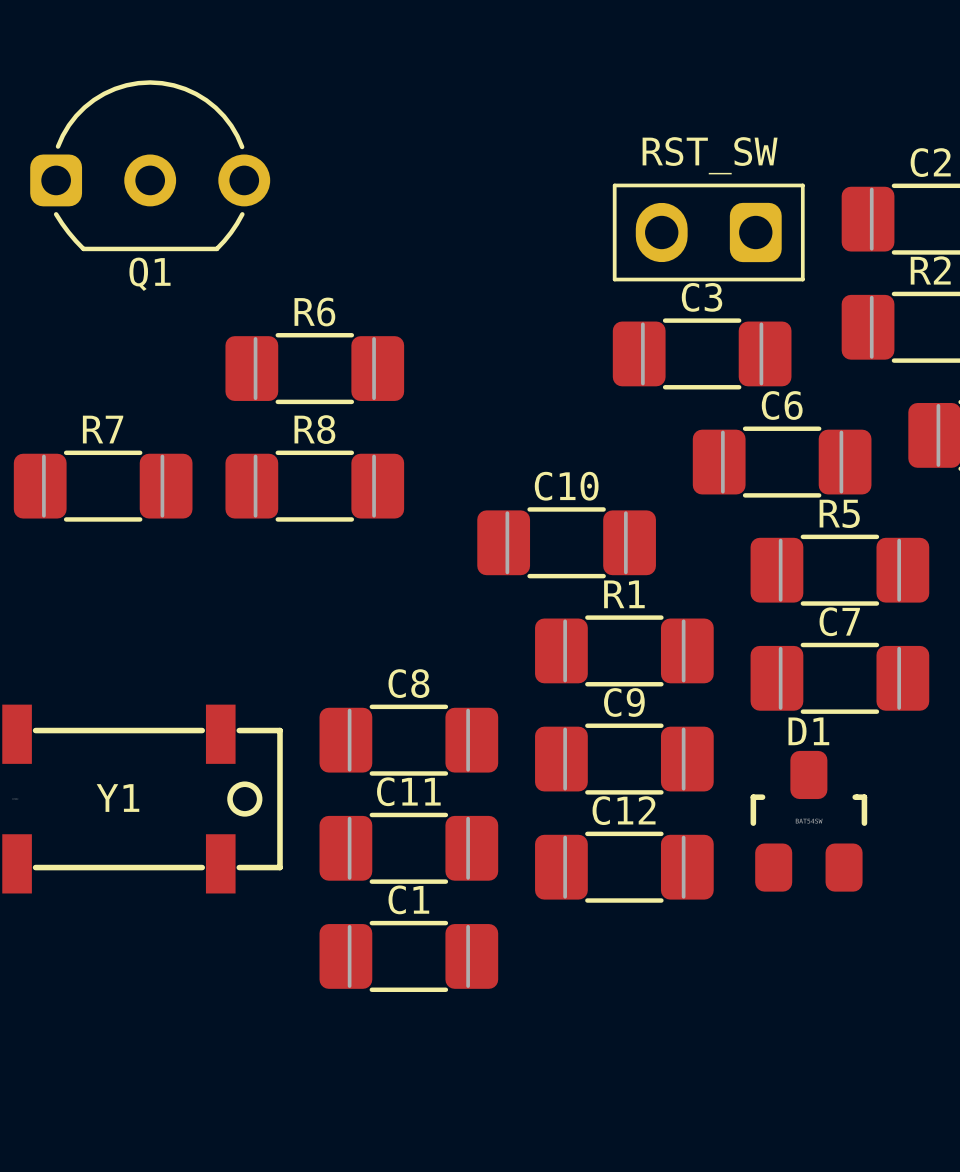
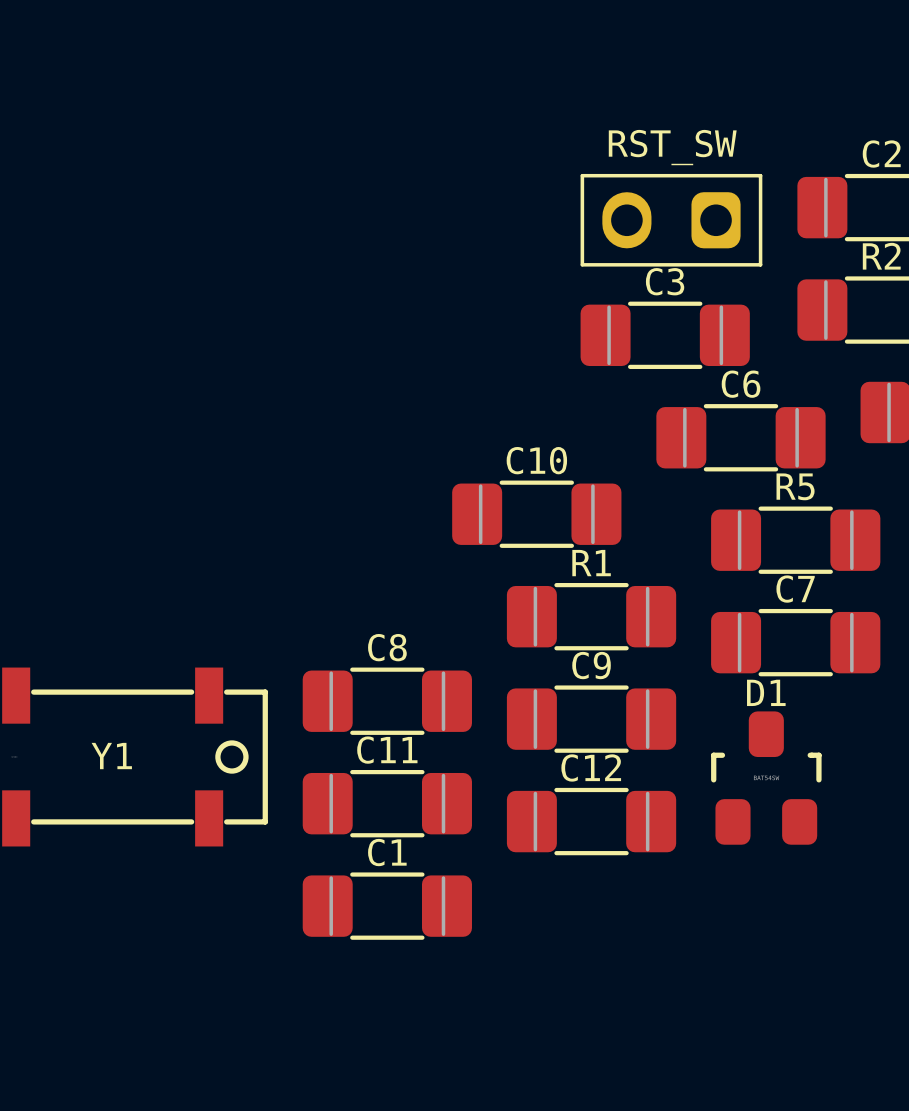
Q1: (150, 165) -> none
R6: (314, 368) -> none
R7: (103, 486) -> none
R8: (314, 486) -> none

